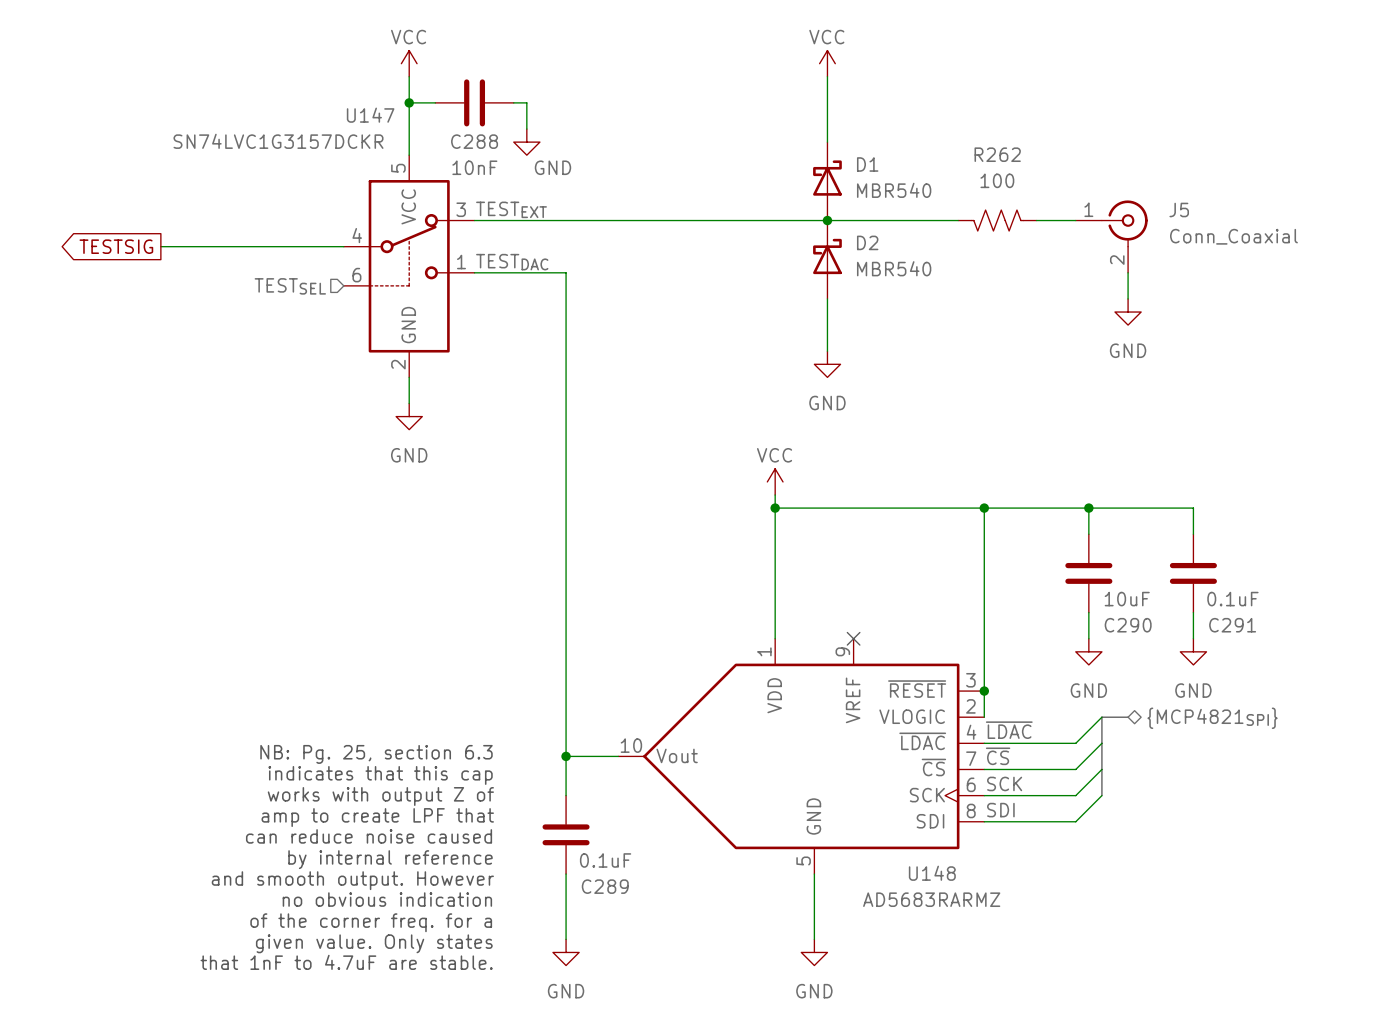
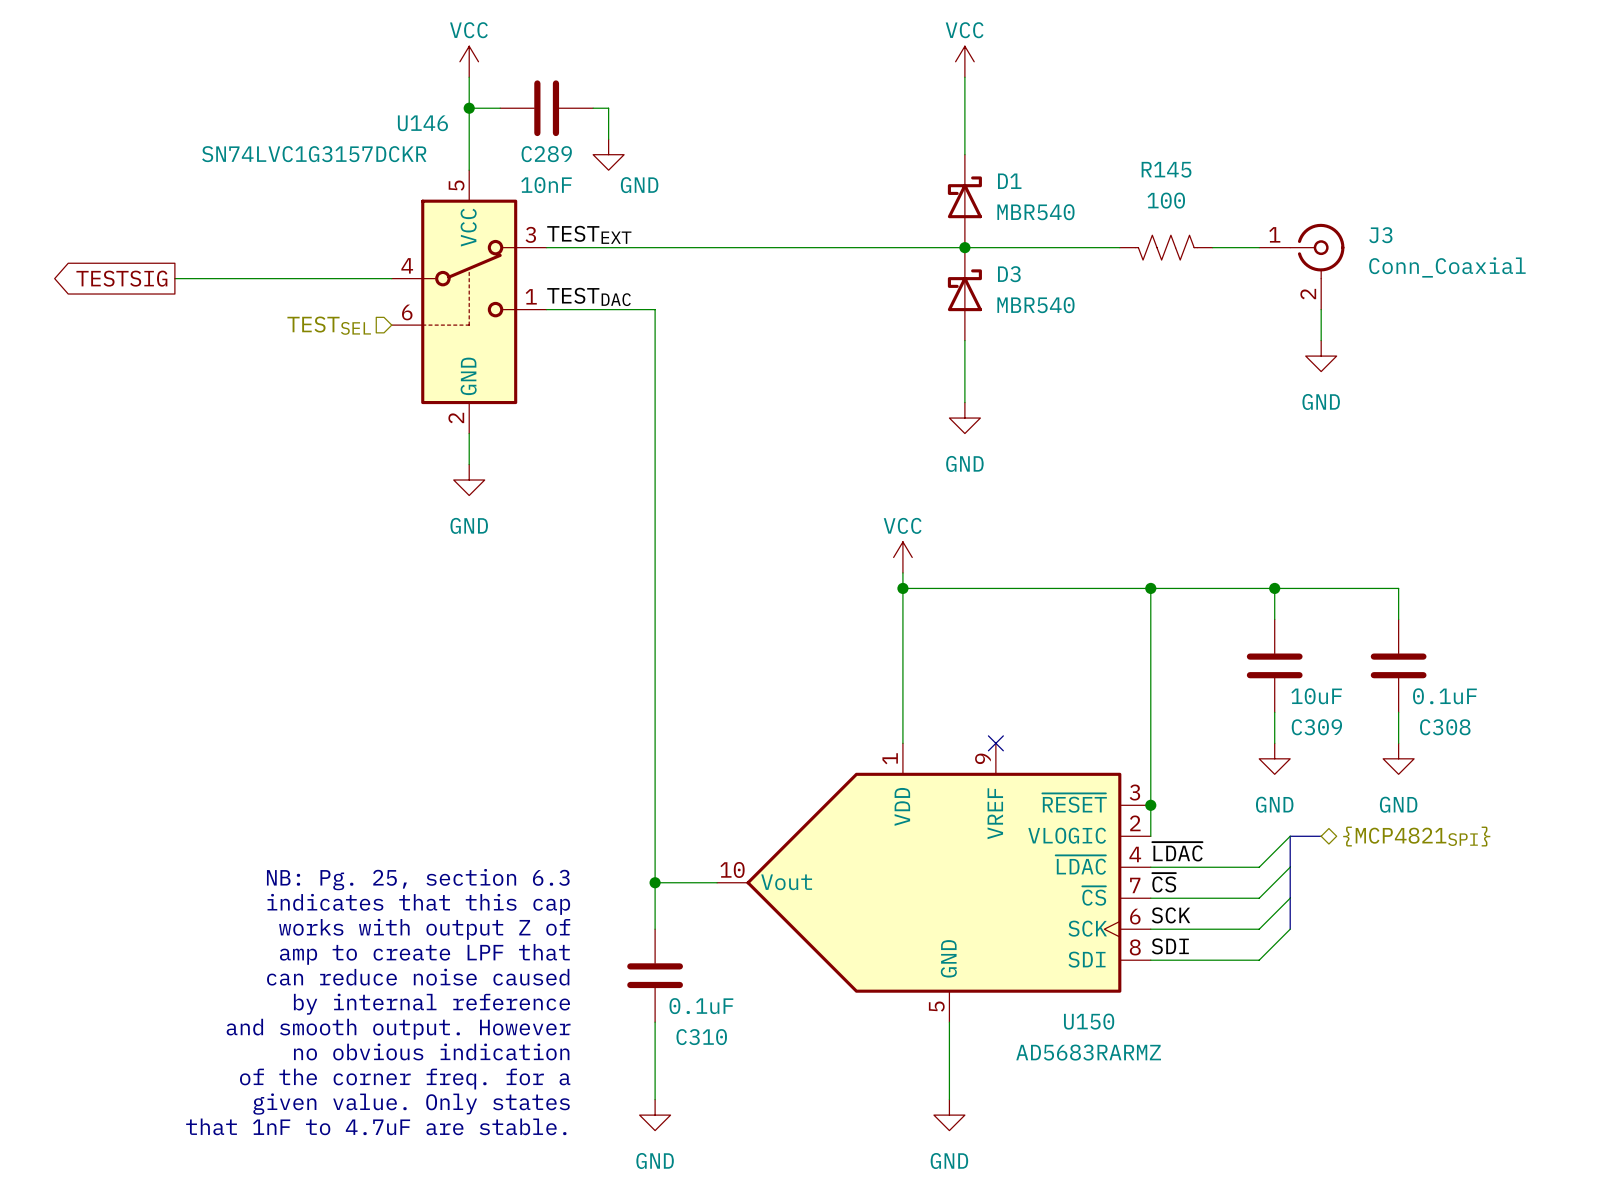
U147 name: U147 (370, 115) -> U146 (422, 123)
C288 name: C288 (474, 141) -> C289 (546, 154)
R262 name: R262 (997, 154) -> R145 (1166, 169)
J5 name: J5 (1179, 209) -> J3 (1380, 235)
D2 name: D2 (867, 242) -> D3 (1009, 274)
C290 name: C290 (1128, 625) -> C309 (1316, 727)
C291 name: C291 (1232, 625) -> C308 (1445, 727)
U148 name: U148 (932, 873) -> U150 (1089, 1021)
C289 name: C289 (605, 886) -> C310 (701, 1037)

